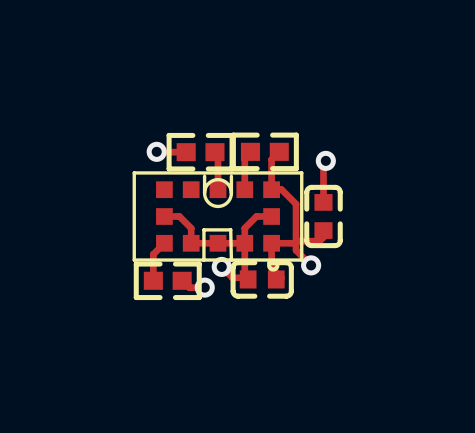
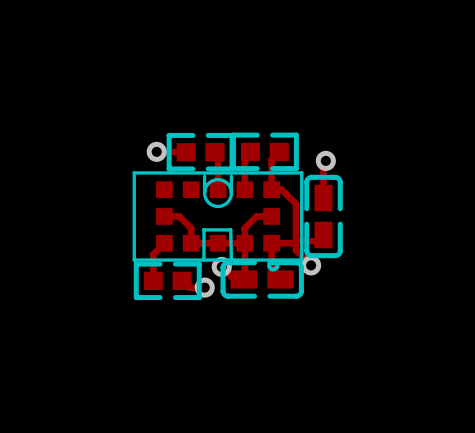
part footprint: [304, 184, 343, 249] -> [304, 174, 343, 259]
part footprint: [230, 260, 294, 299] -> [220, 260, 304, 299]

